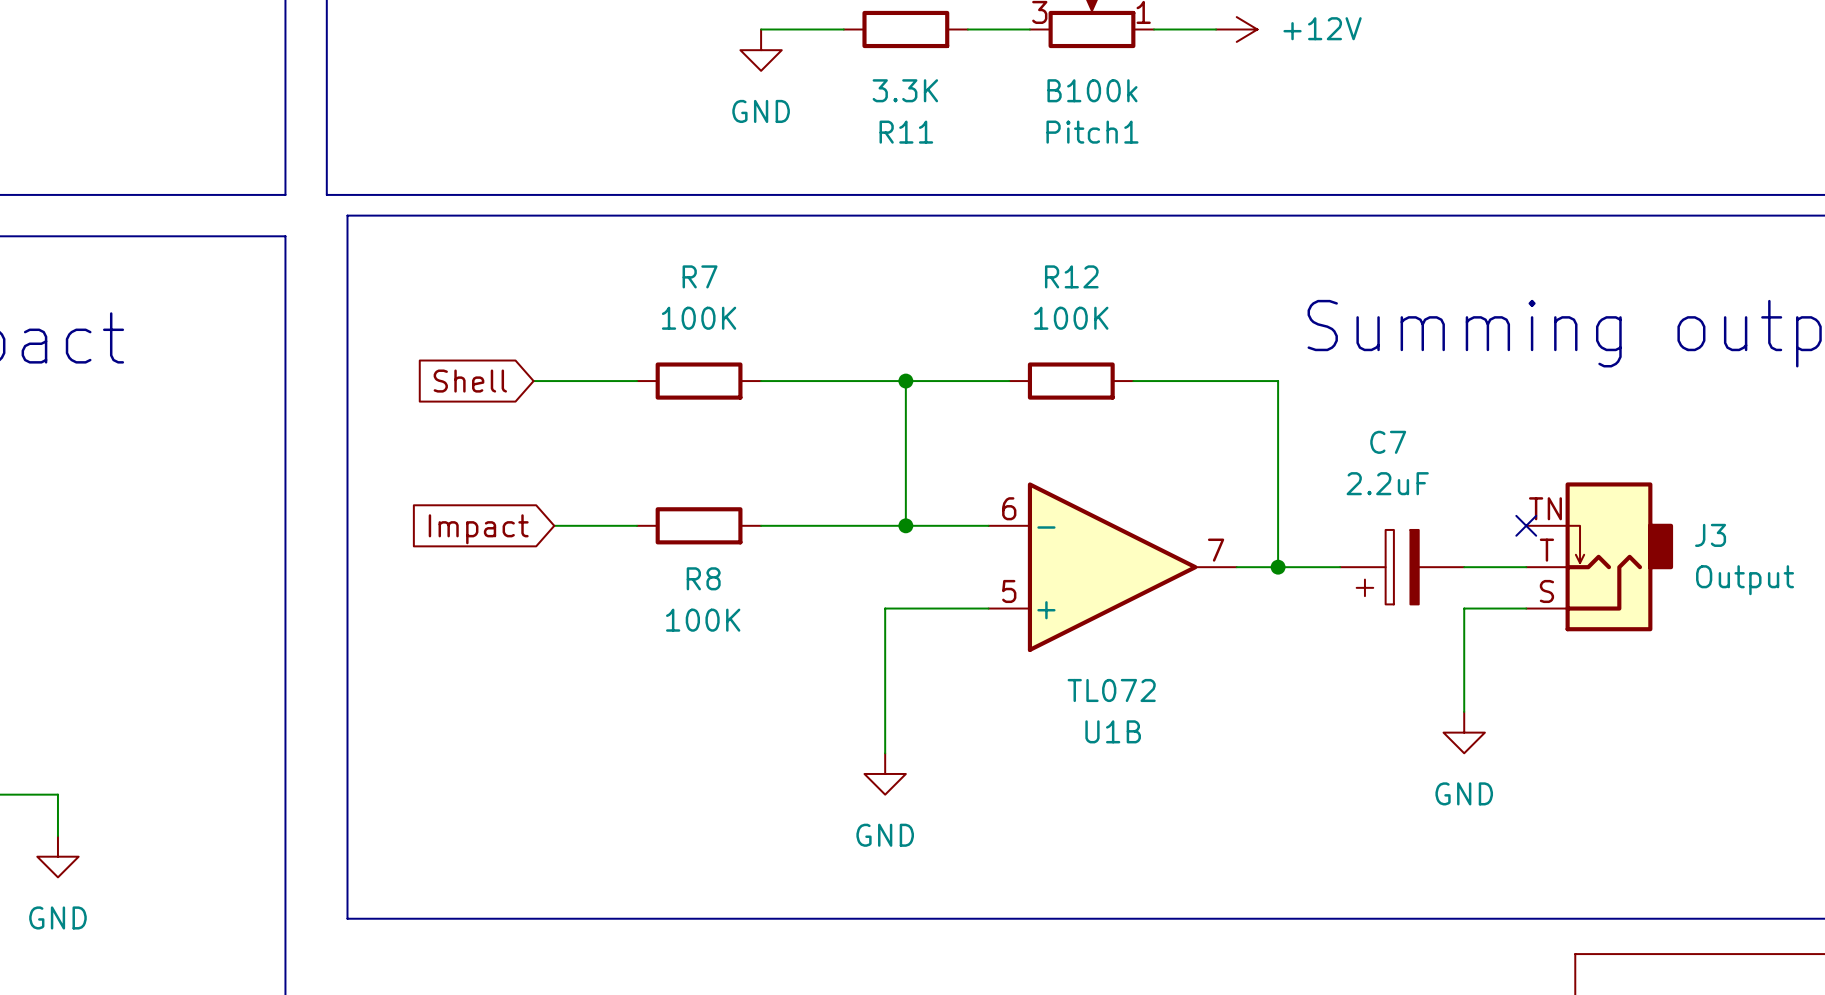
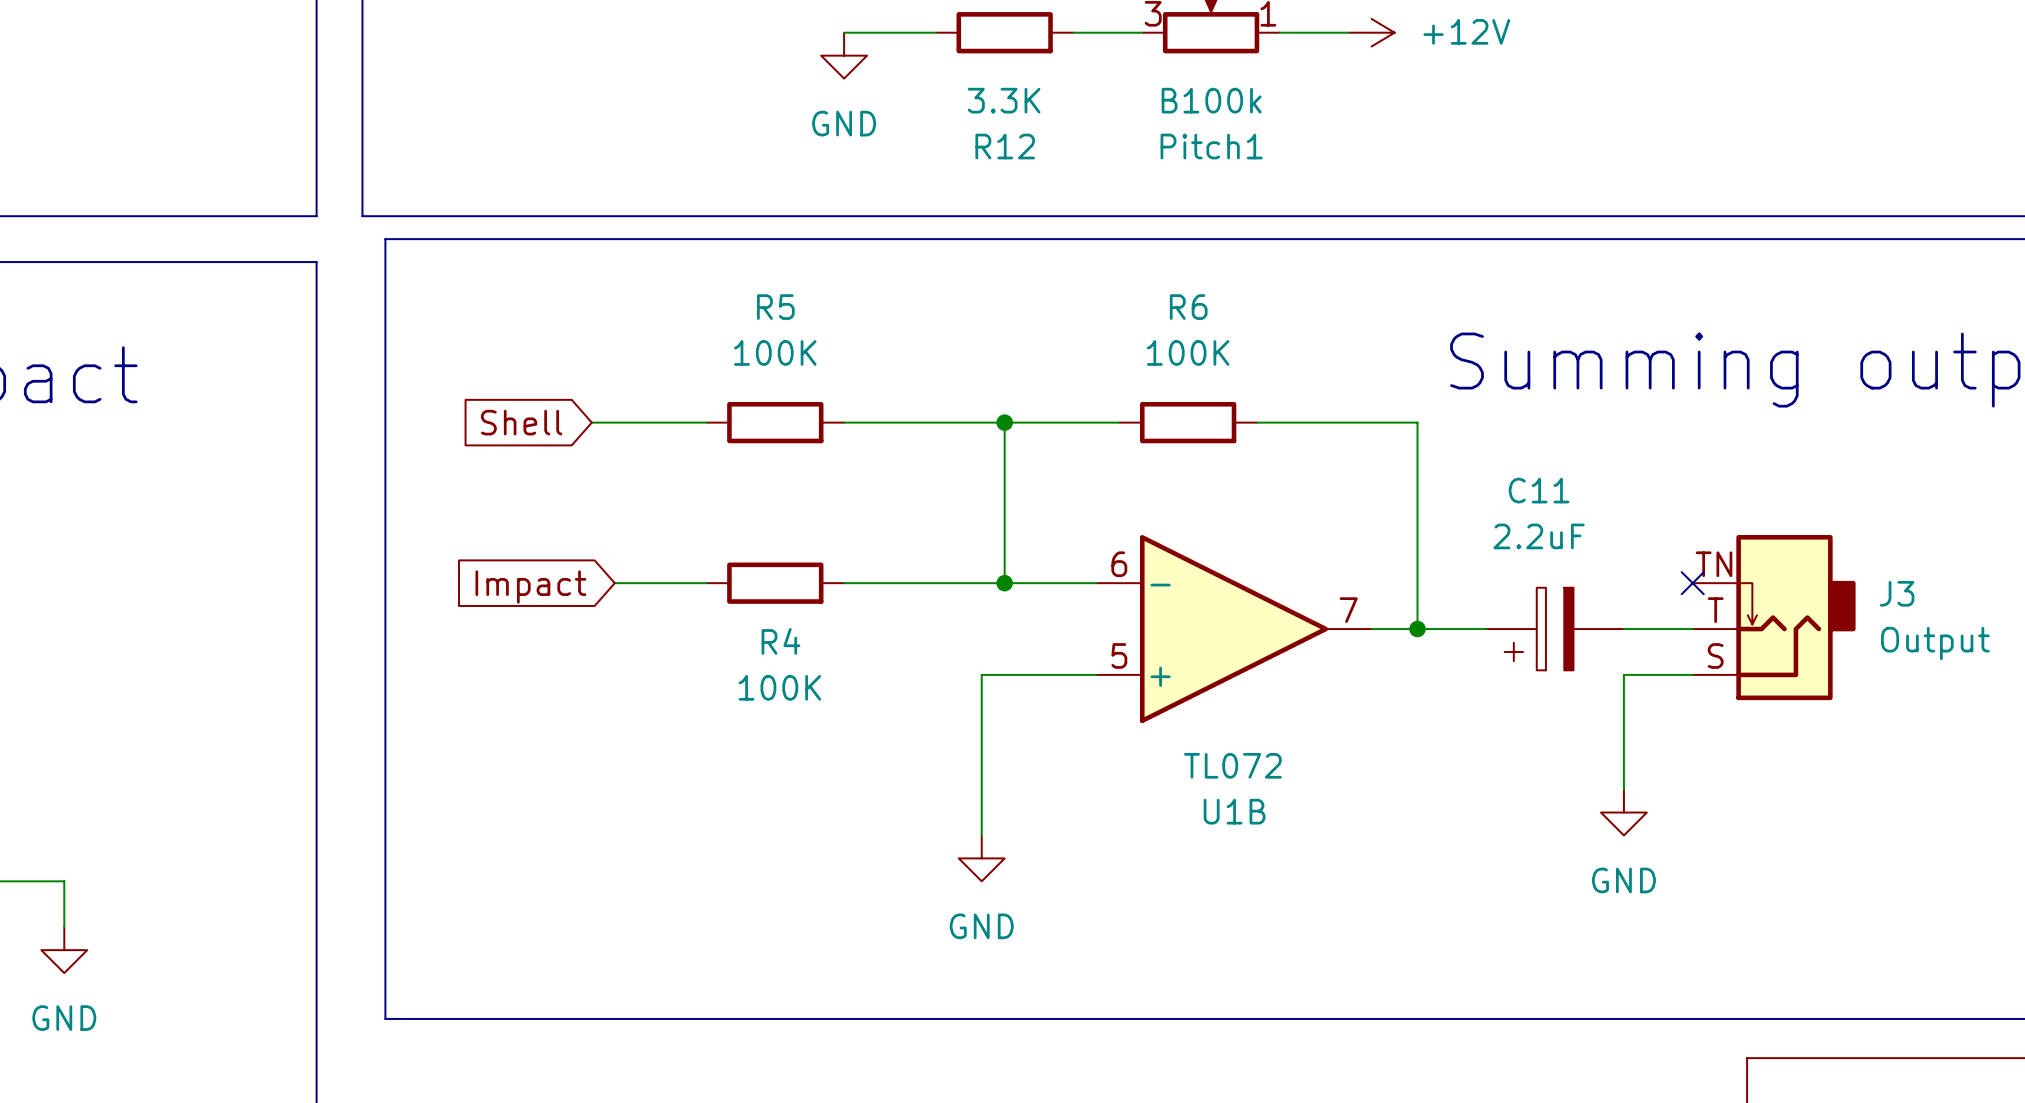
R11 name: R11 (906, 132) -> R12 (1005, 146)
R7 name: R7 (700, 276) -> R5 (775, 307)
R12 name: R12 (1071, 276) -> R6 (1188, 307)
C7 name: C7 (1388, 442) -> C11 (1539, 490)
R8 name: R8 (703, 578) -> R4 (780, 641)

